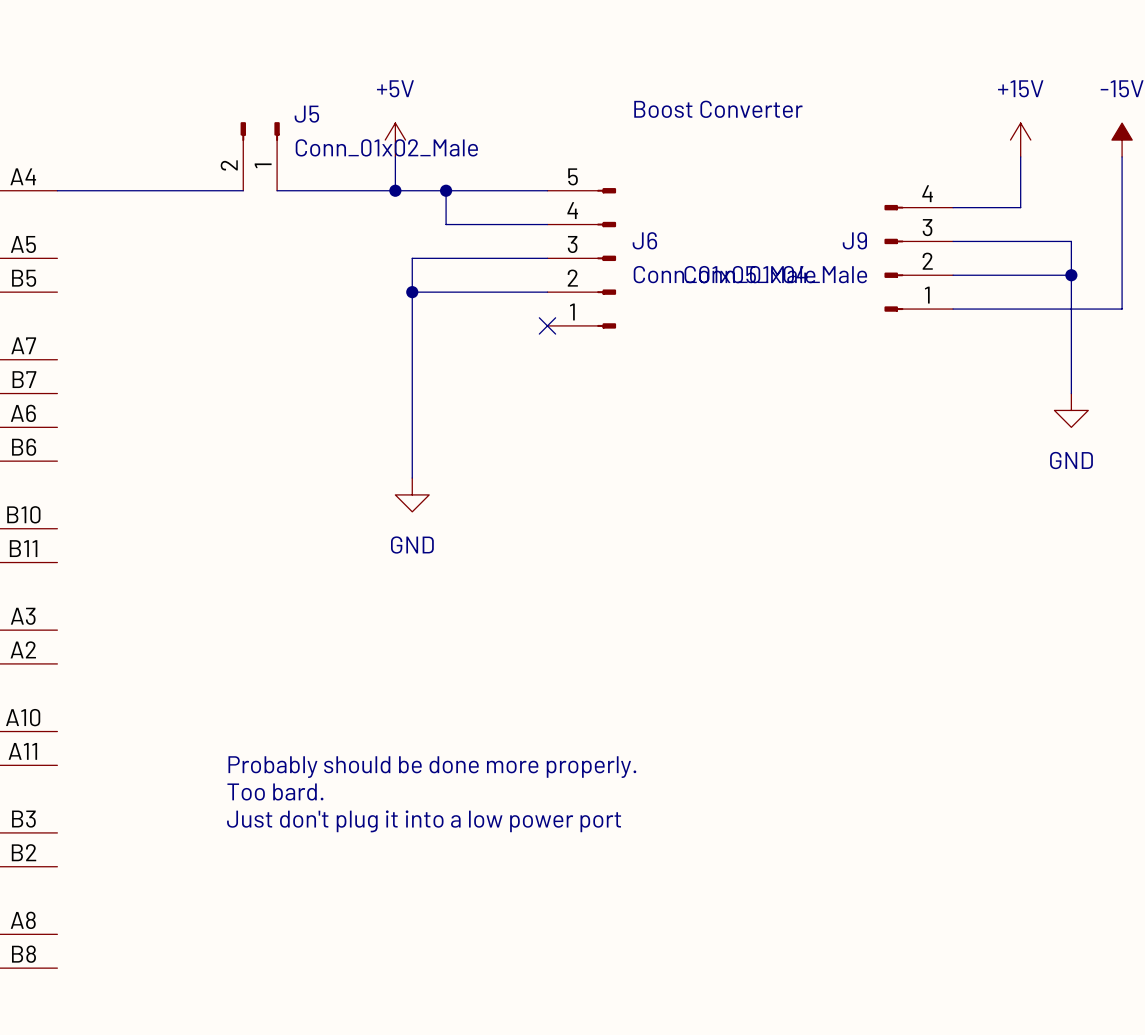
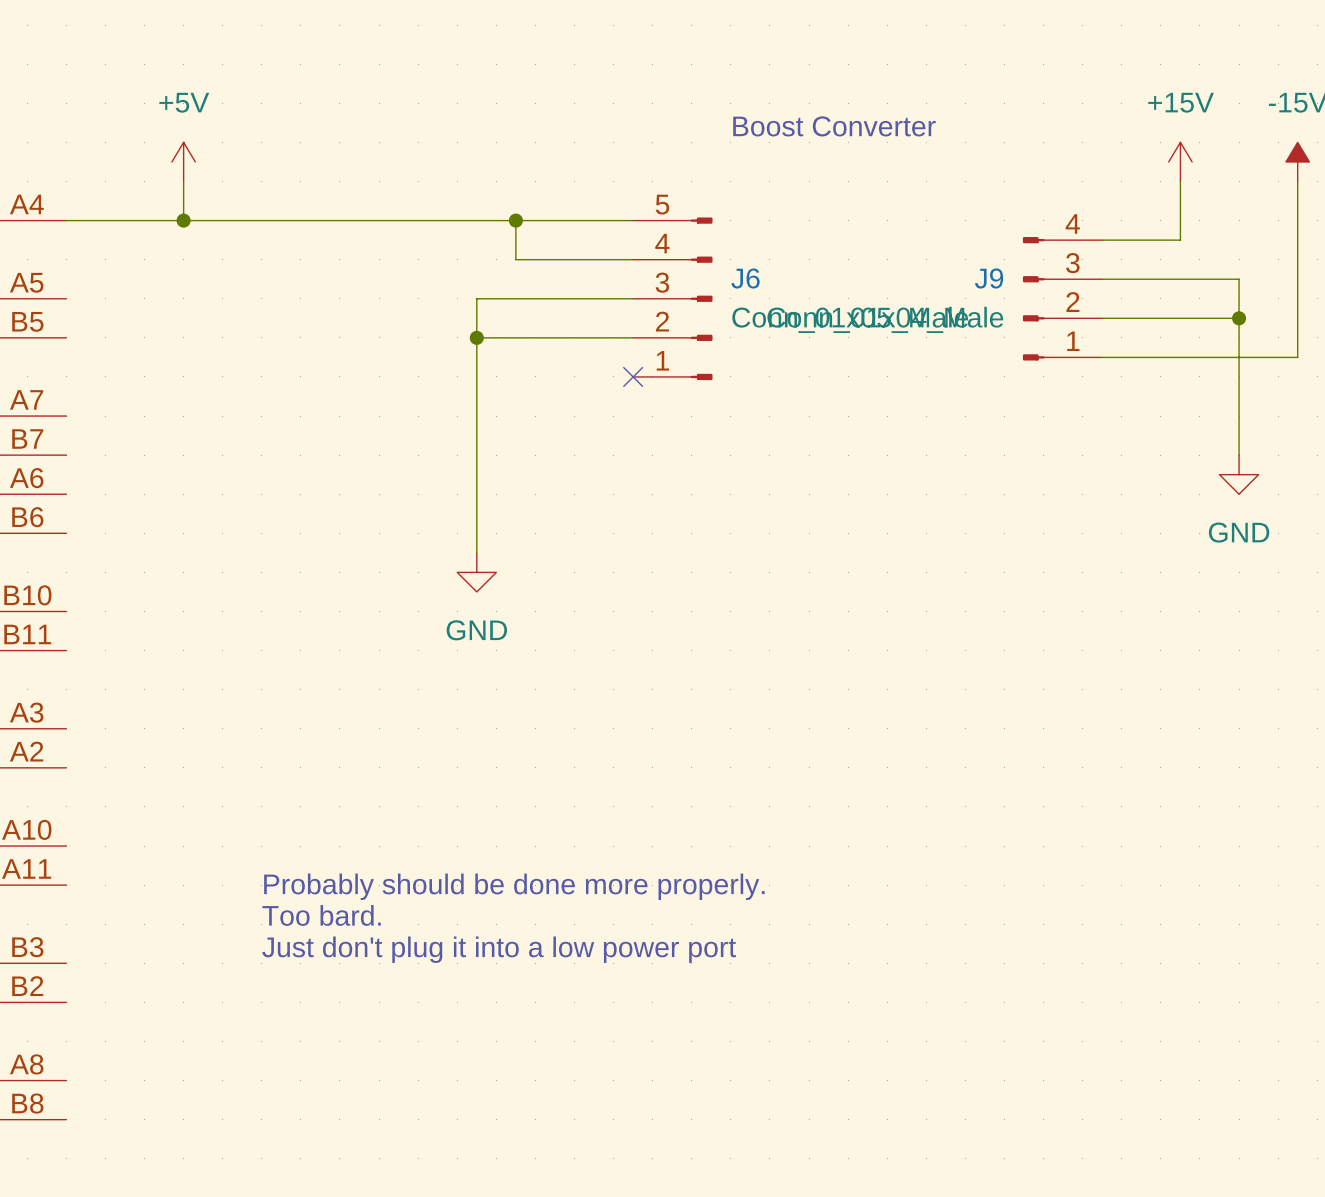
power symbol position: +5V (395, 140) -> +5V (183, 161)
J5: Conn_01x02_Male (260, 156) -> none
wire: (395, 156) (395, 190) -> (183, 181) (183, 220)
junction: none -> (183, 220)
wire: none -> (281, 220) (320, 220)
junction: (395, 190) -> none

